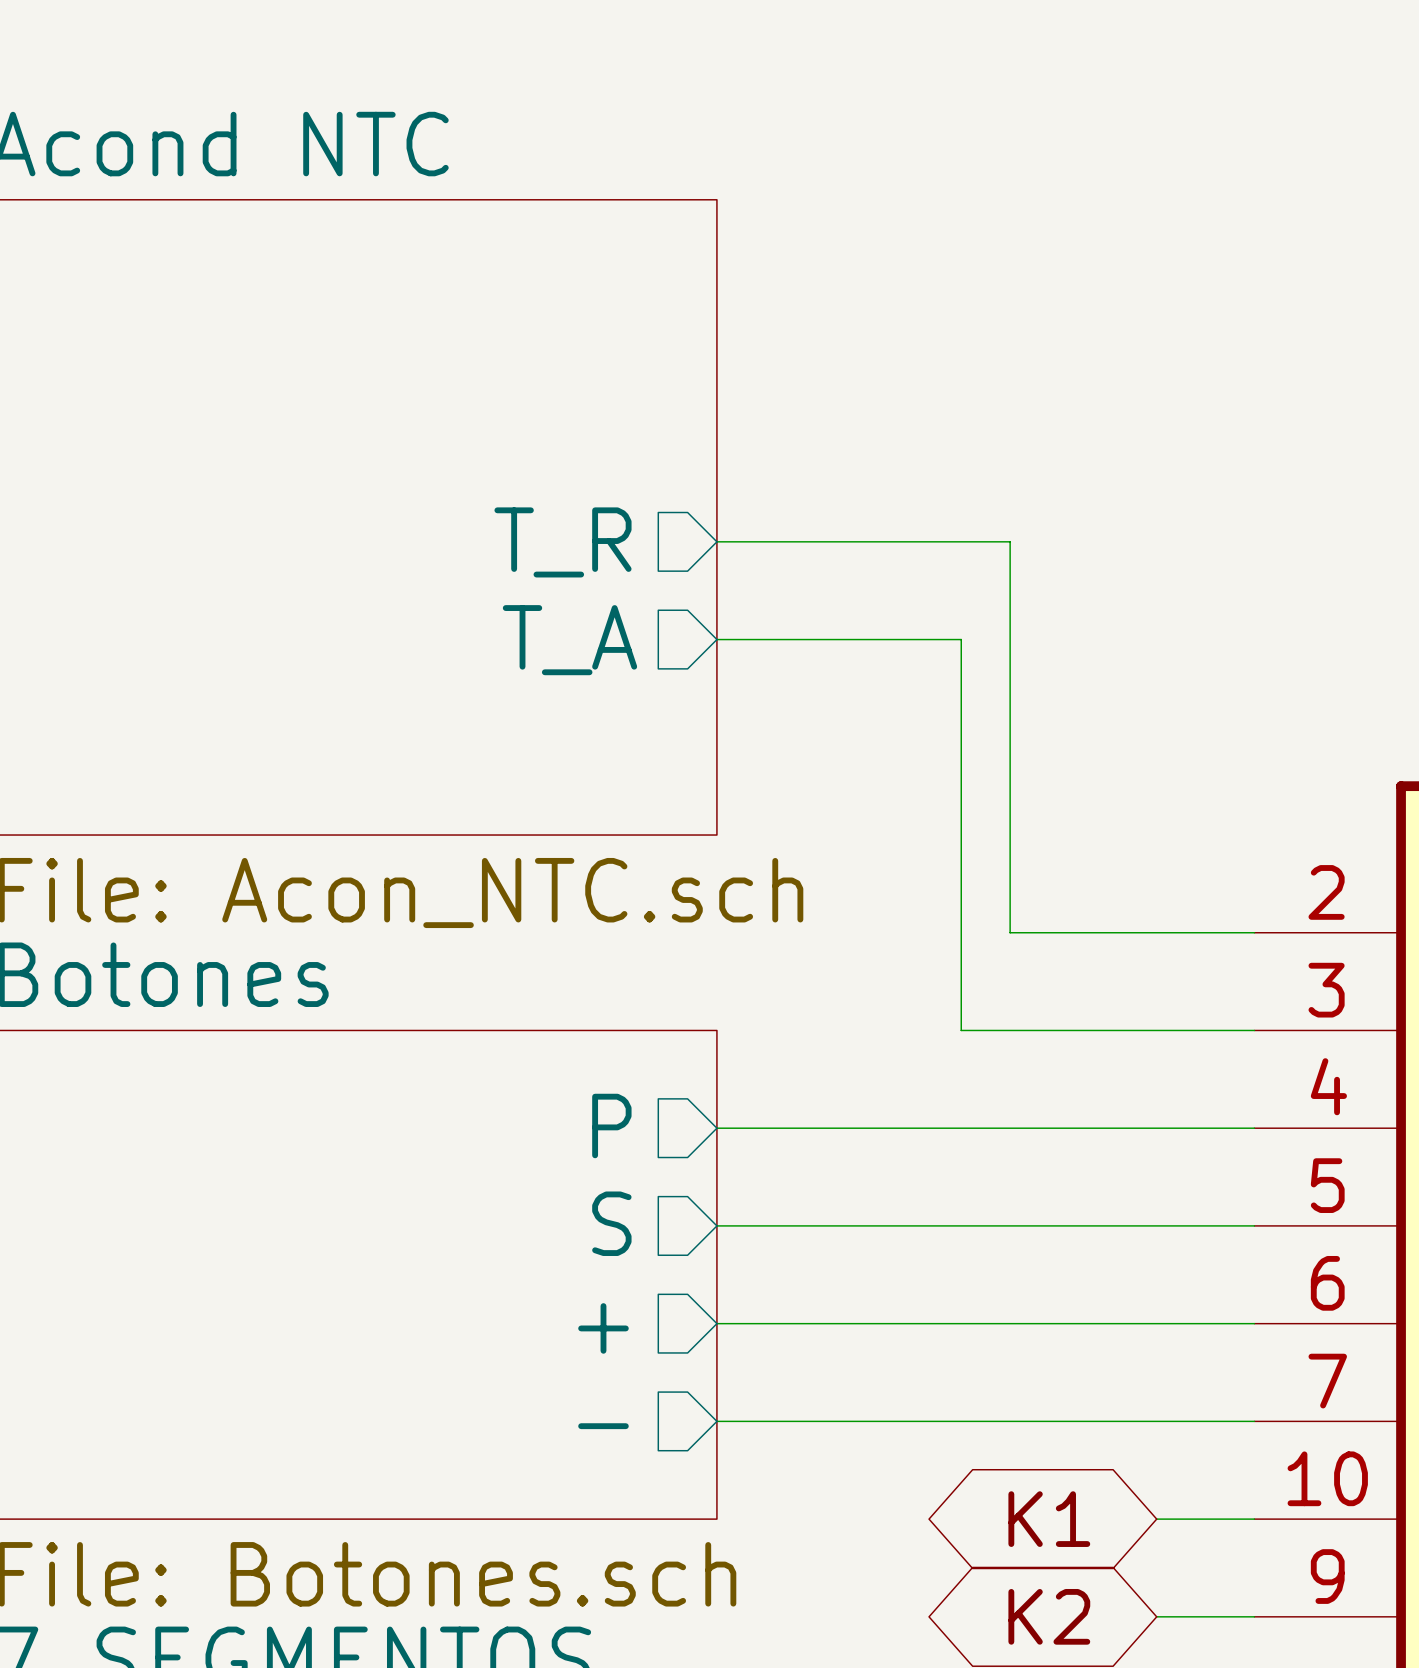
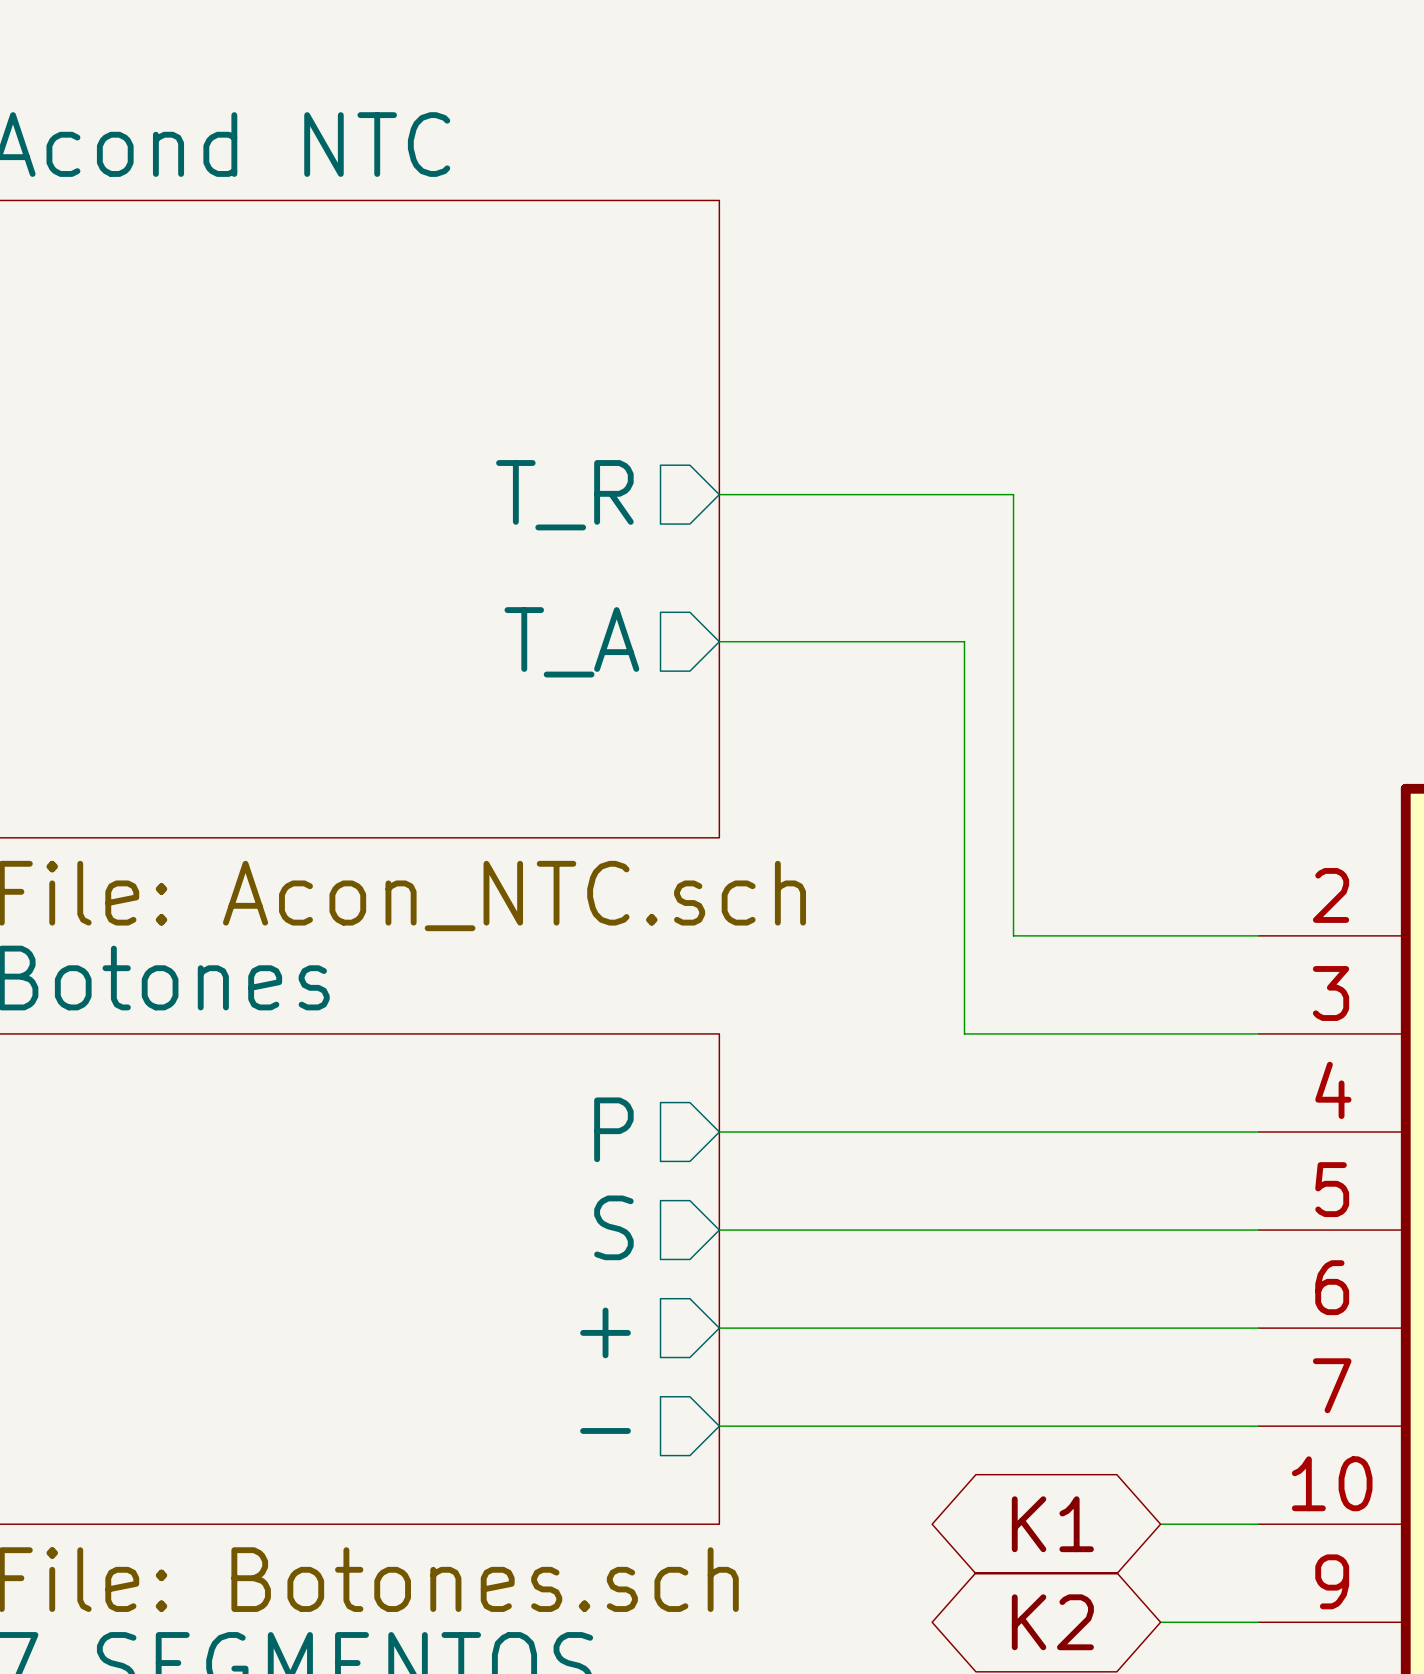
wire: (716, 541) (1010, 541) -> (719, 494) (1013, 494) (1013, 543)
sheet pin position: T_R (563, 542) -> T_R (564, 495)

